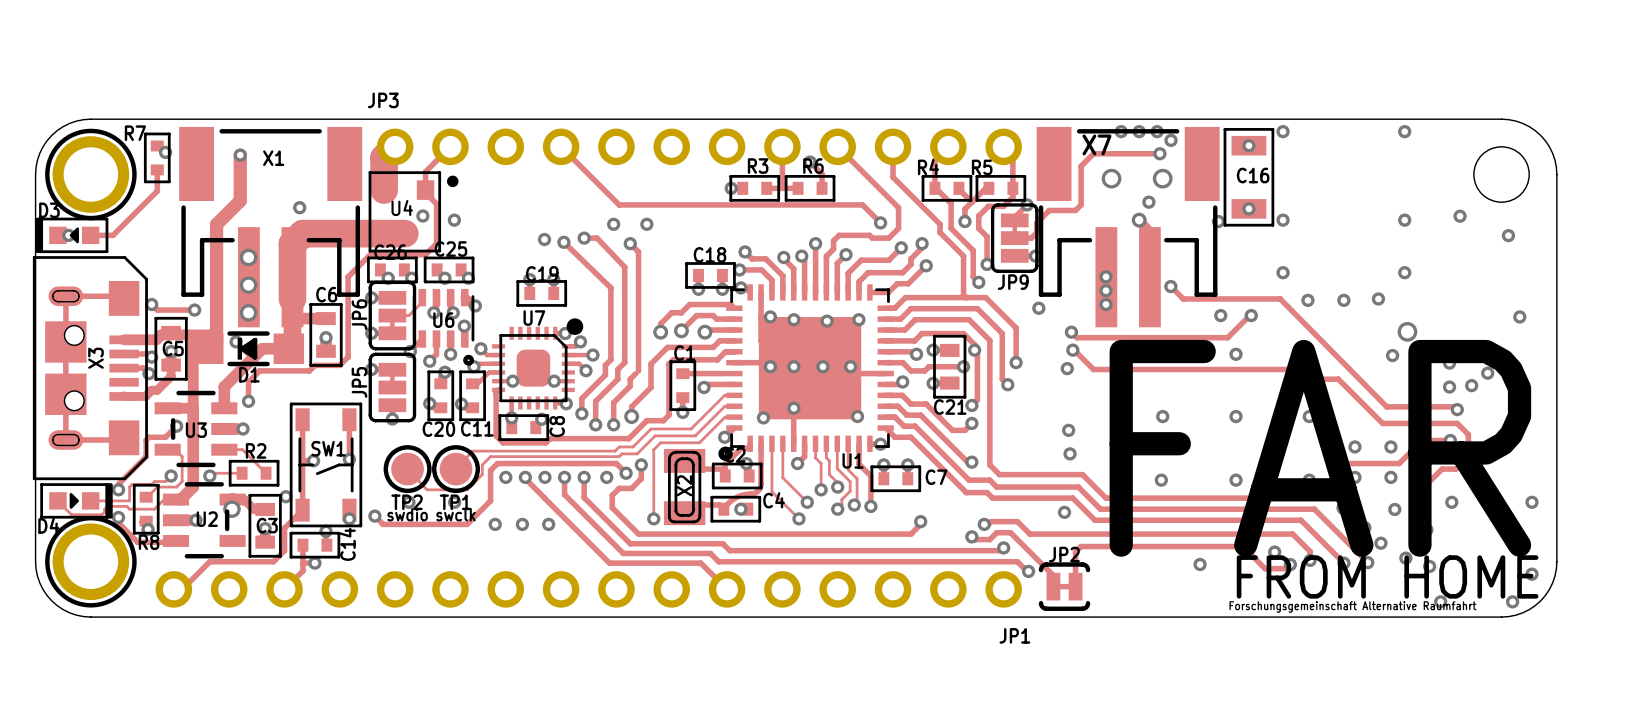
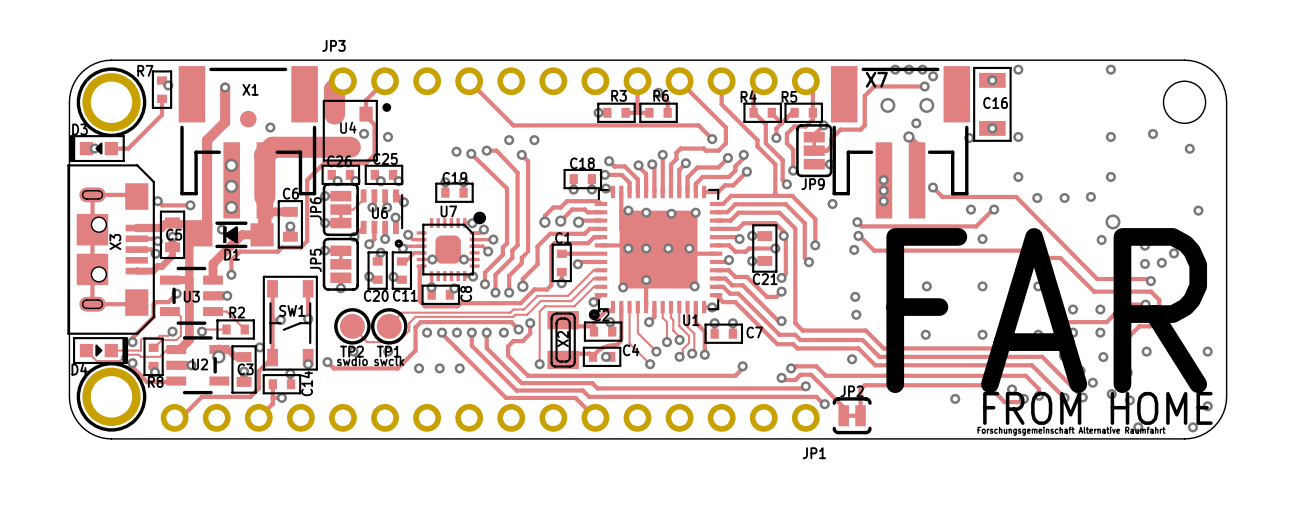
part: none -> (248, 119)

